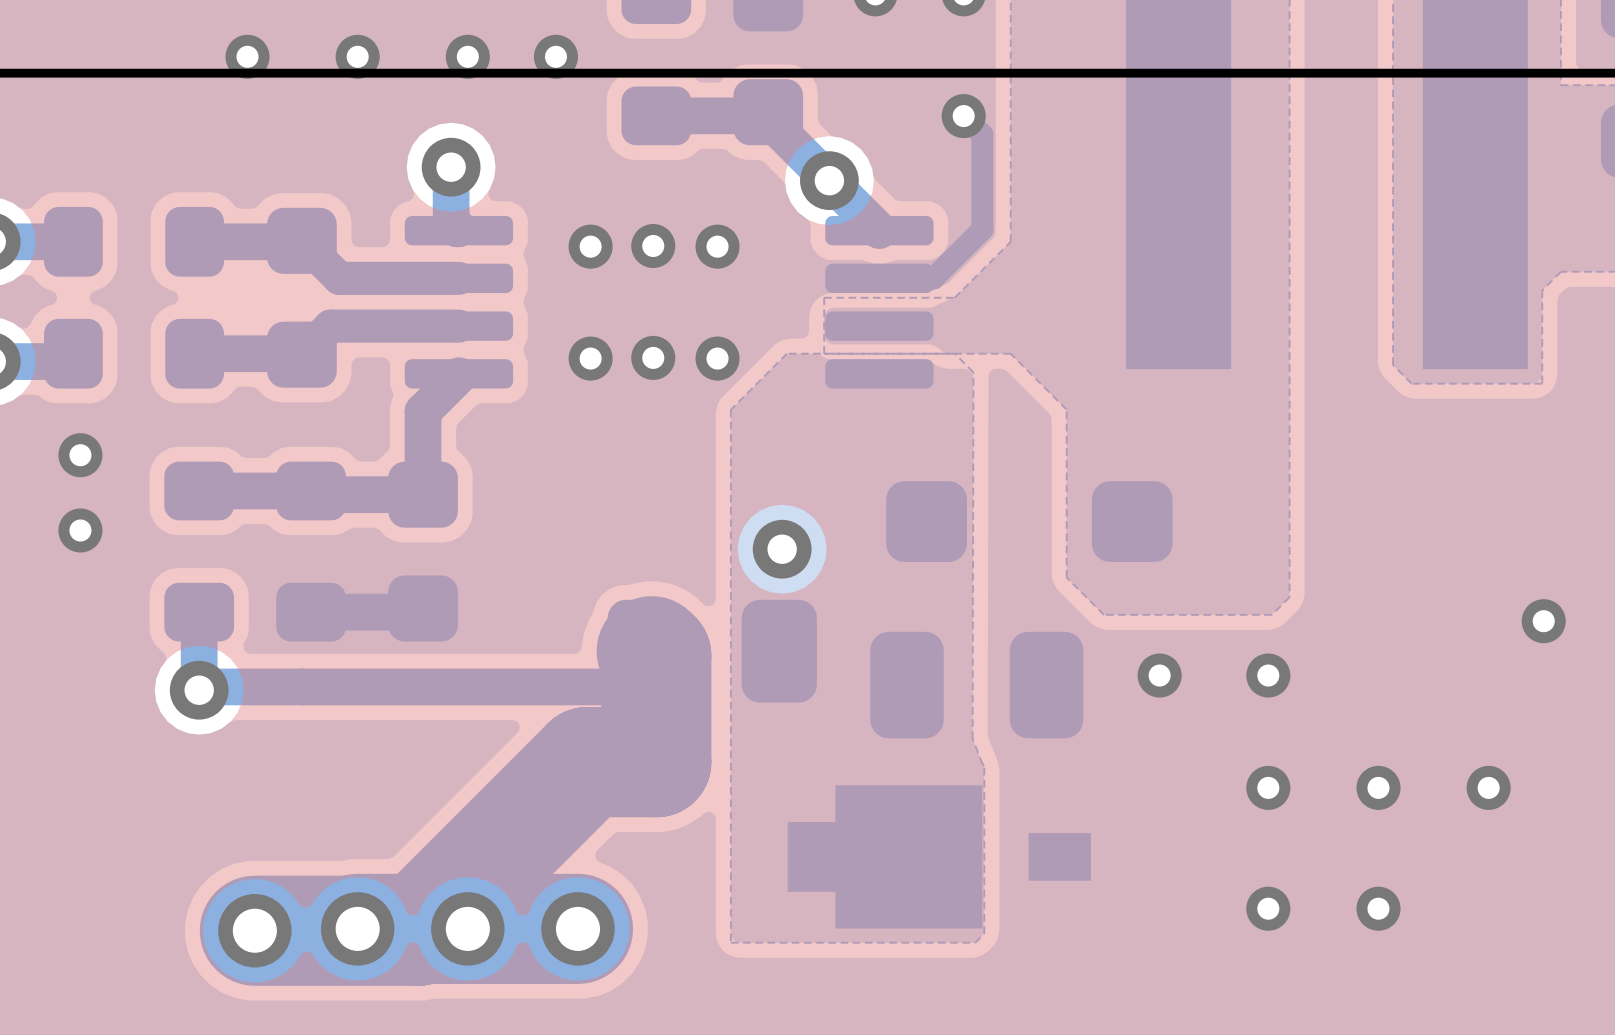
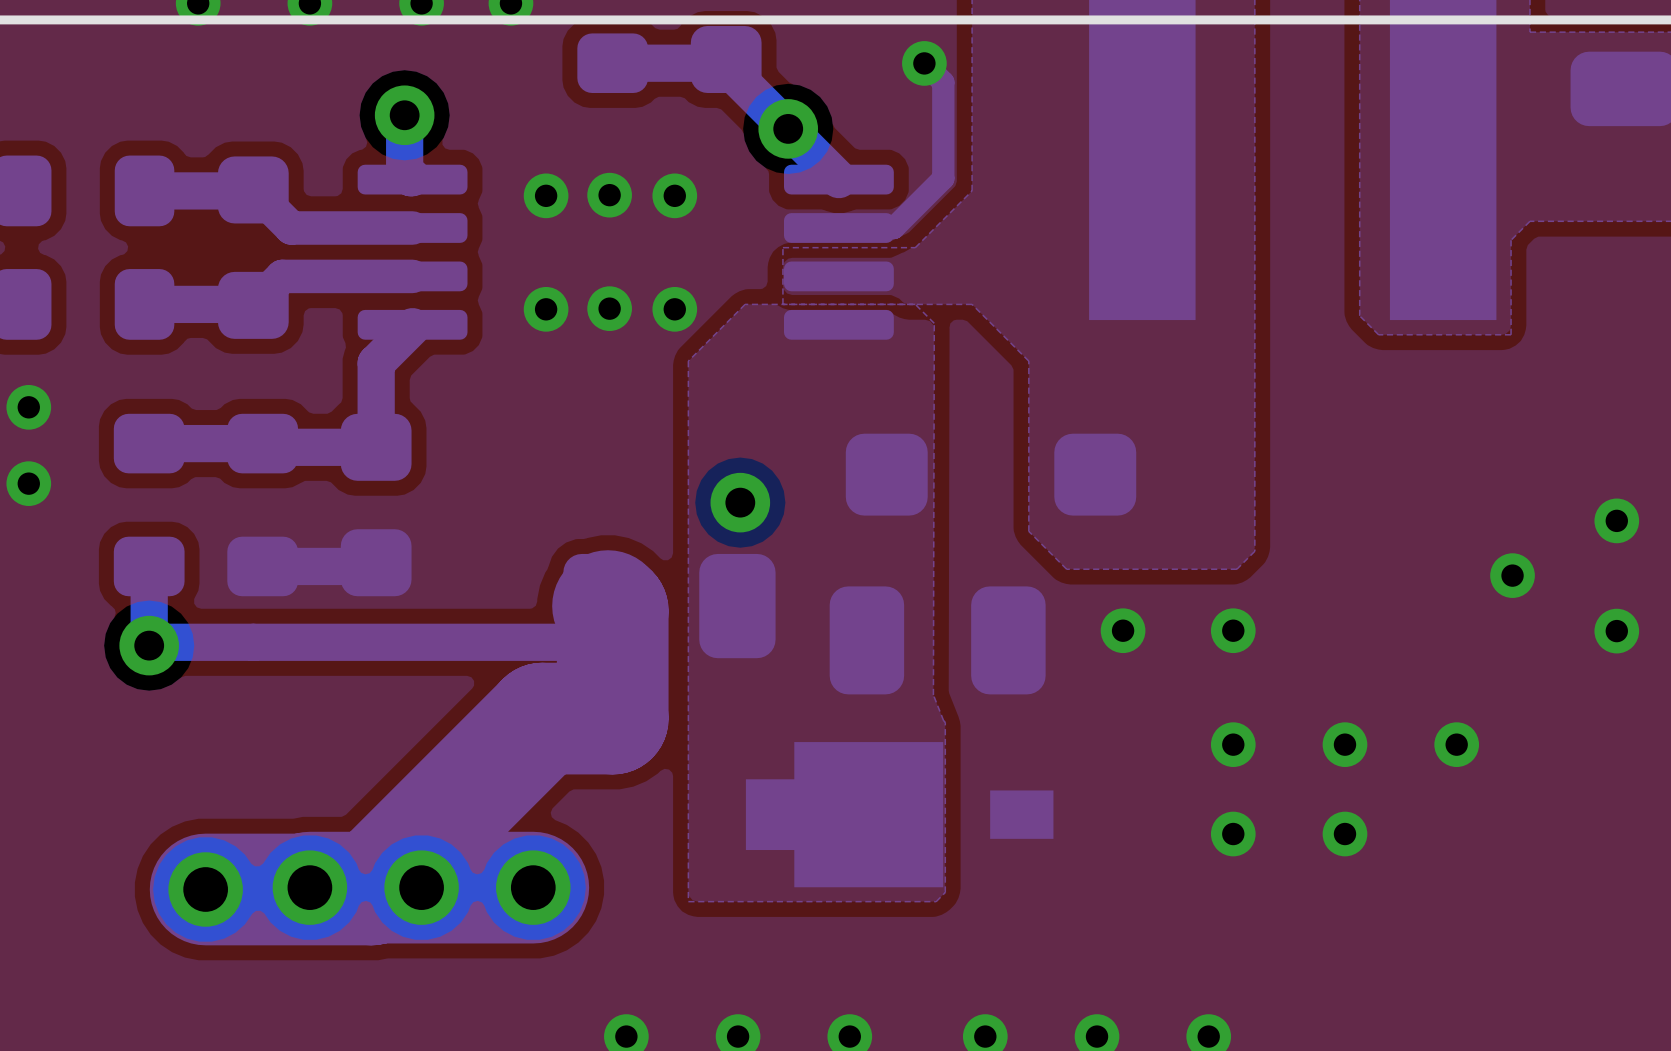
via position: (1268, 908) -> (1233, 834)
via position: (1378, 908) -> (1344, 834)

